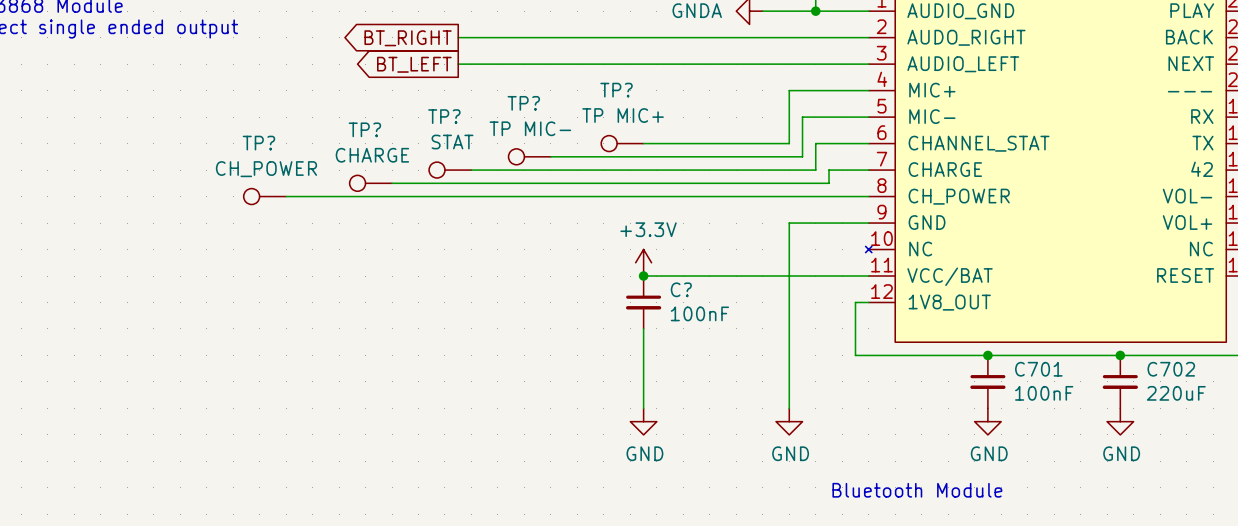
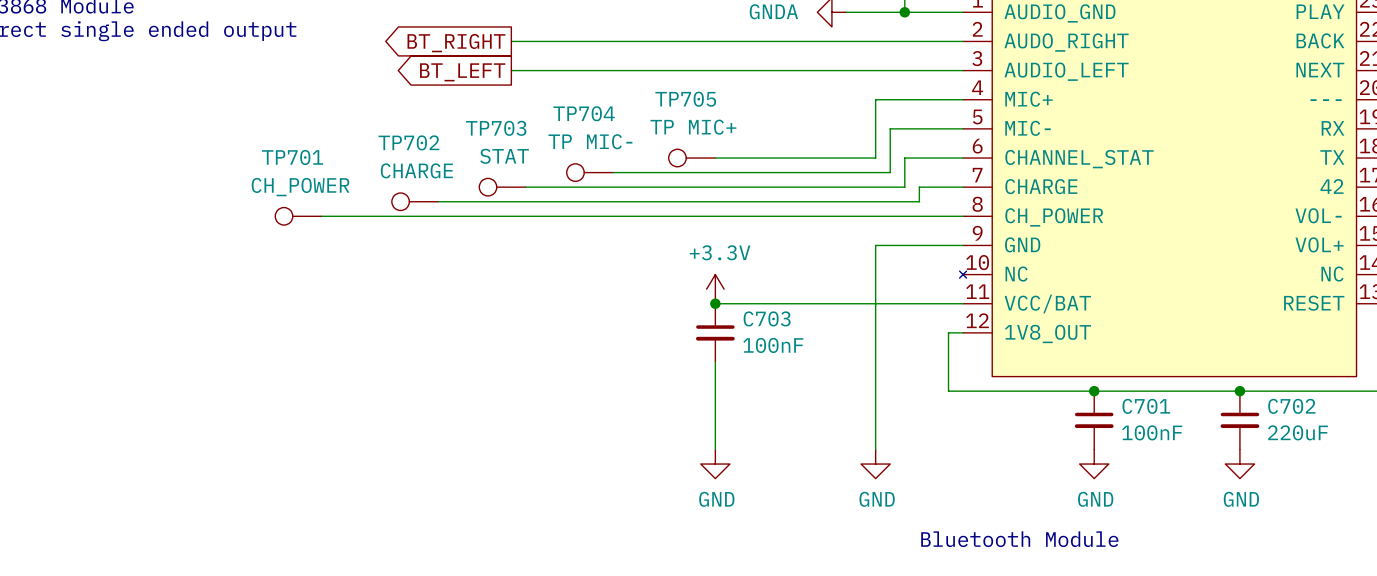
TP? name: TP? (616, 90) -> TP705 (685, 99)
TP? name: TP? (523, 103) -> TP704 (584, 113)
TP? name: TP? (444, 116) -> TP703 (496, 128)
TP? name: TP? (364, 129) -> TP702 (408, 142)
TP? name: TP? (258, 143) -> TP701 (292, 157)
C? name: C? (681, 289) -> C703 (767, 318)

